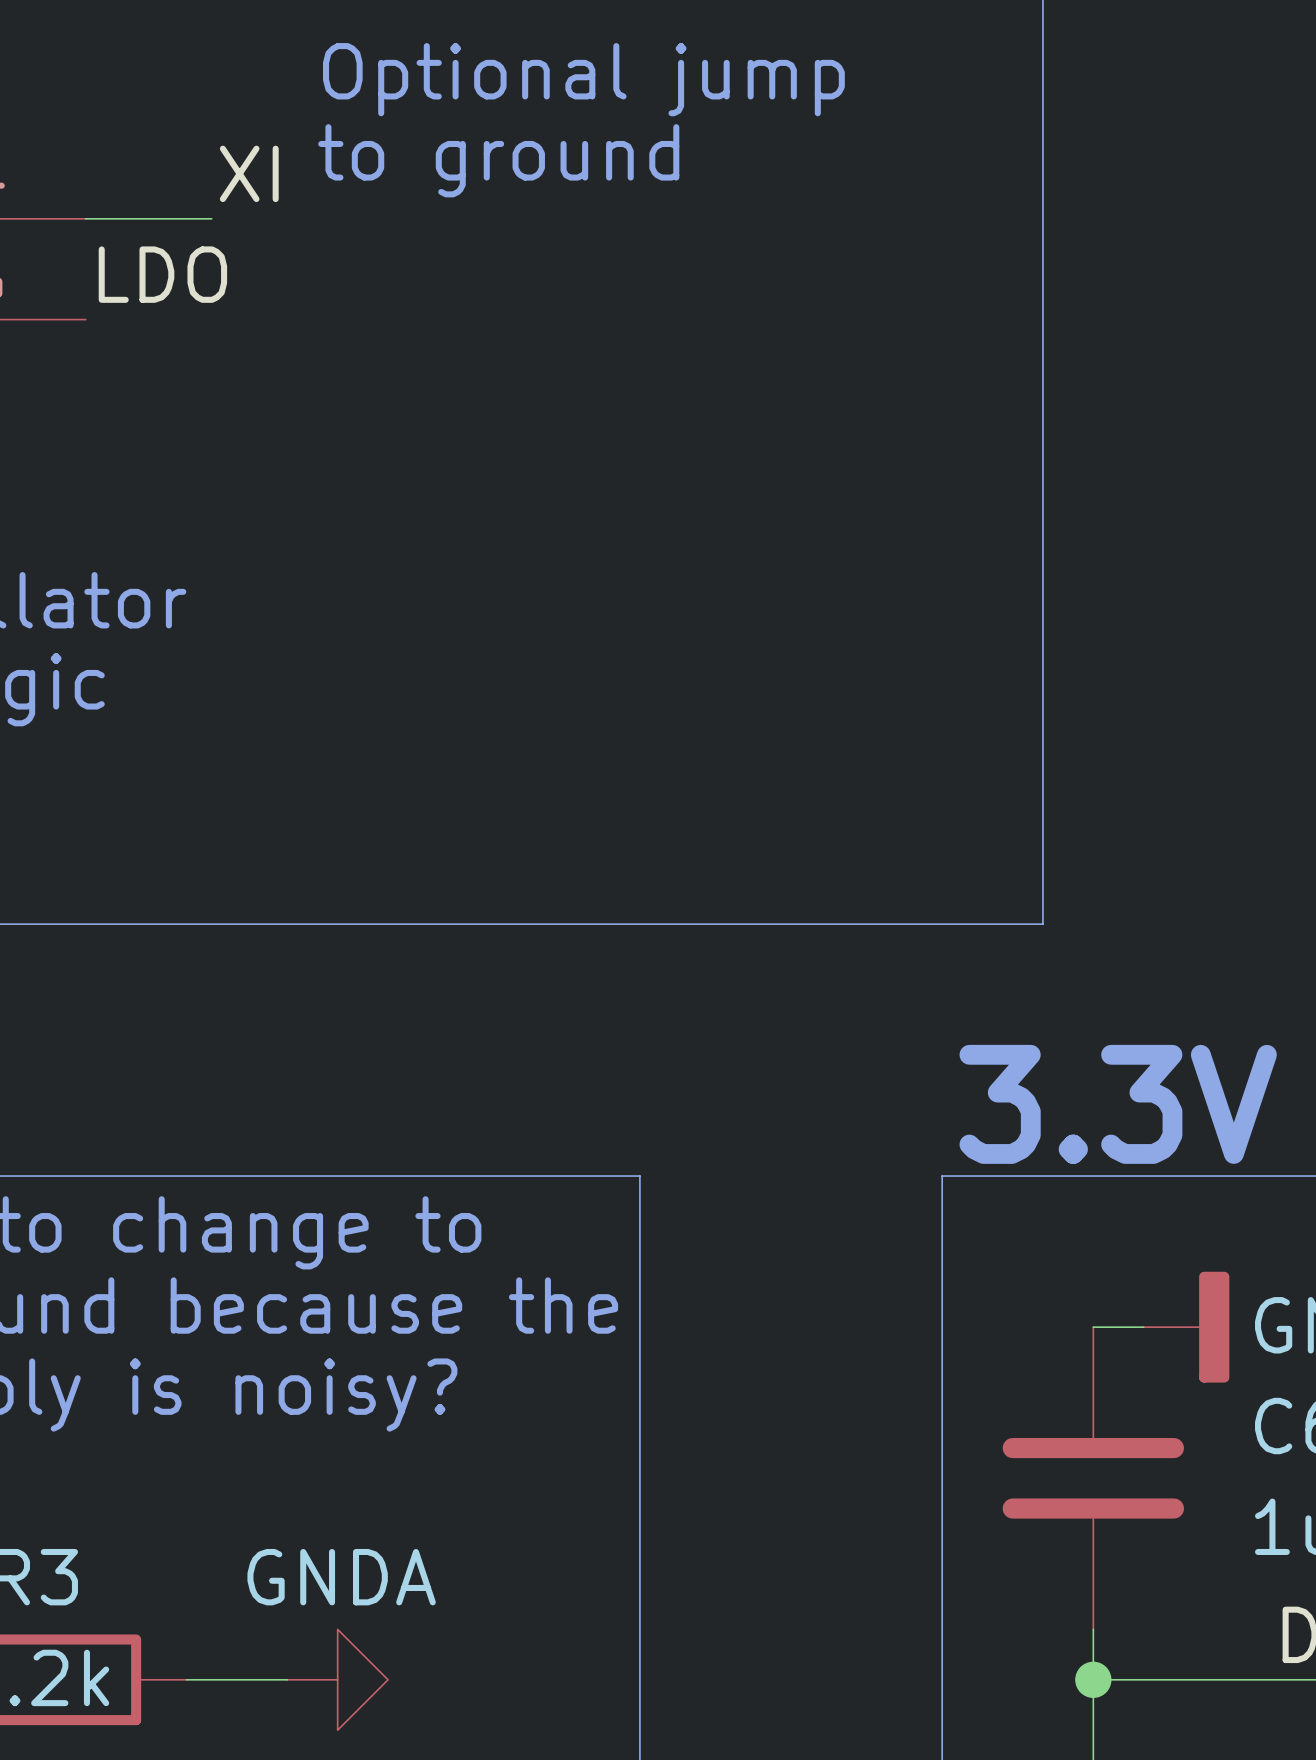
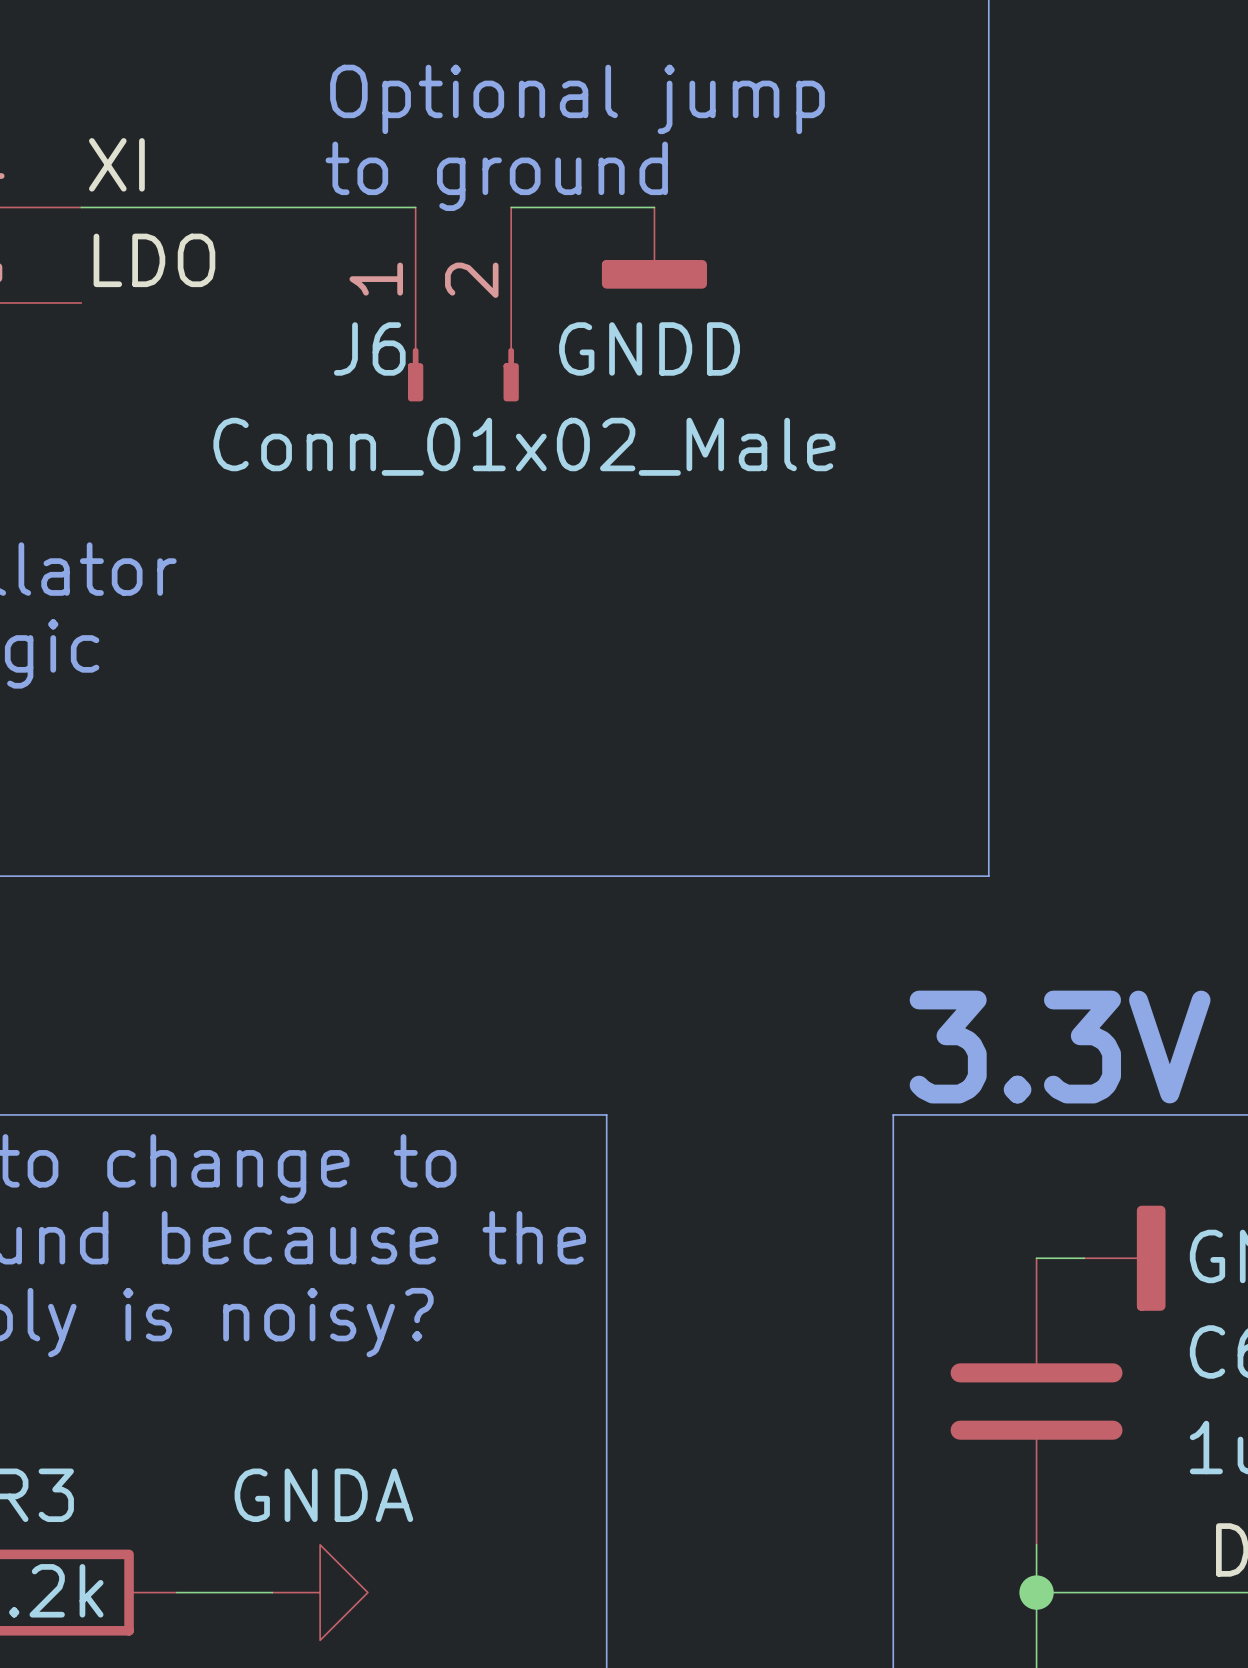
text position: Optional jump (583, 79) -> Optional jump (577, 99)
text position: to ground (498, 160) -> to ground (496, 176)
label position: XI (249, 173) -> XI (116, 164)
wire: none -> (200, 207) (415, 207)
wire: none -> (511, 207) (654, 207)
power symbol: none -> GNDD (654, 248)
J6: none -> Conn_01x02_Male (463, 304)

